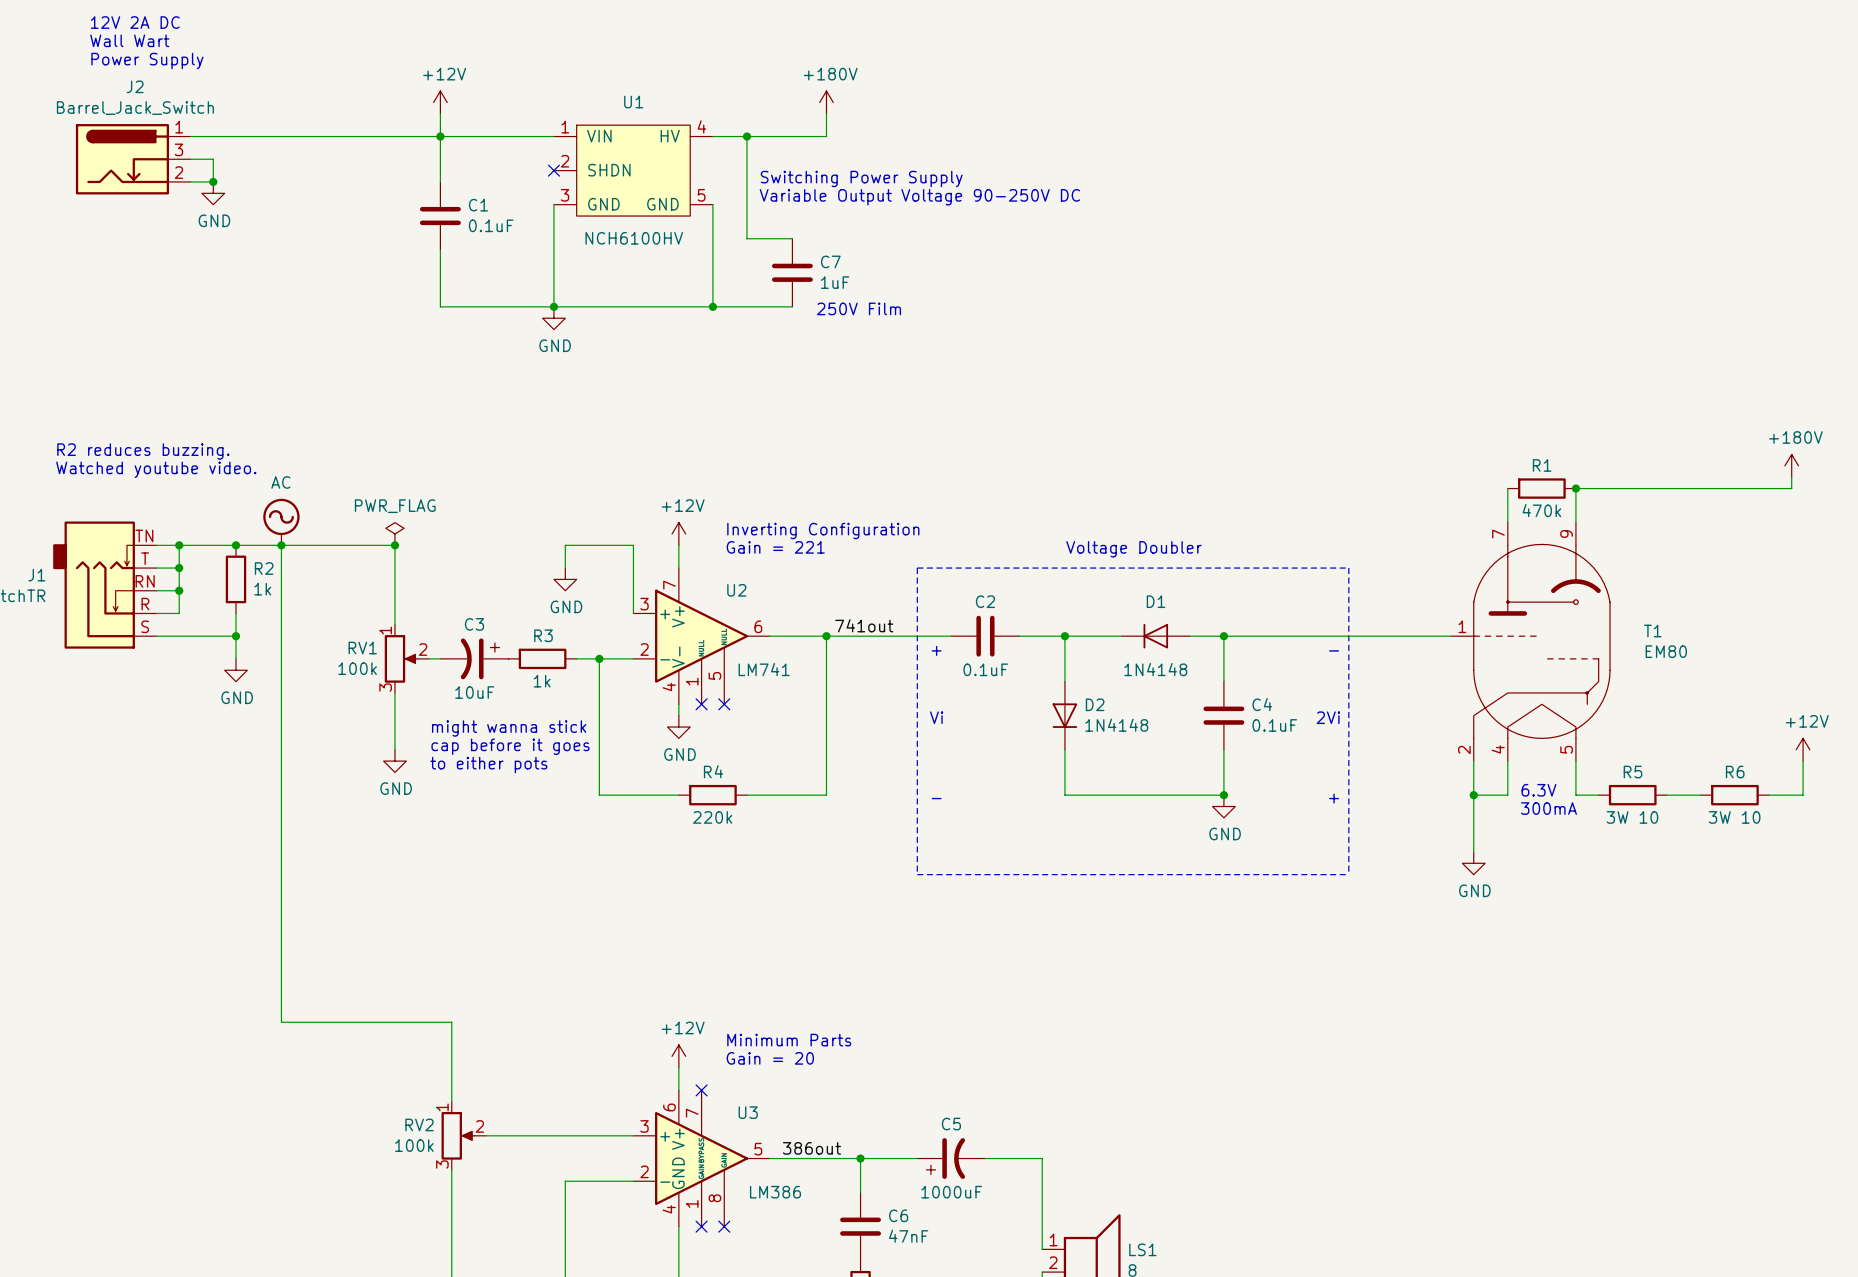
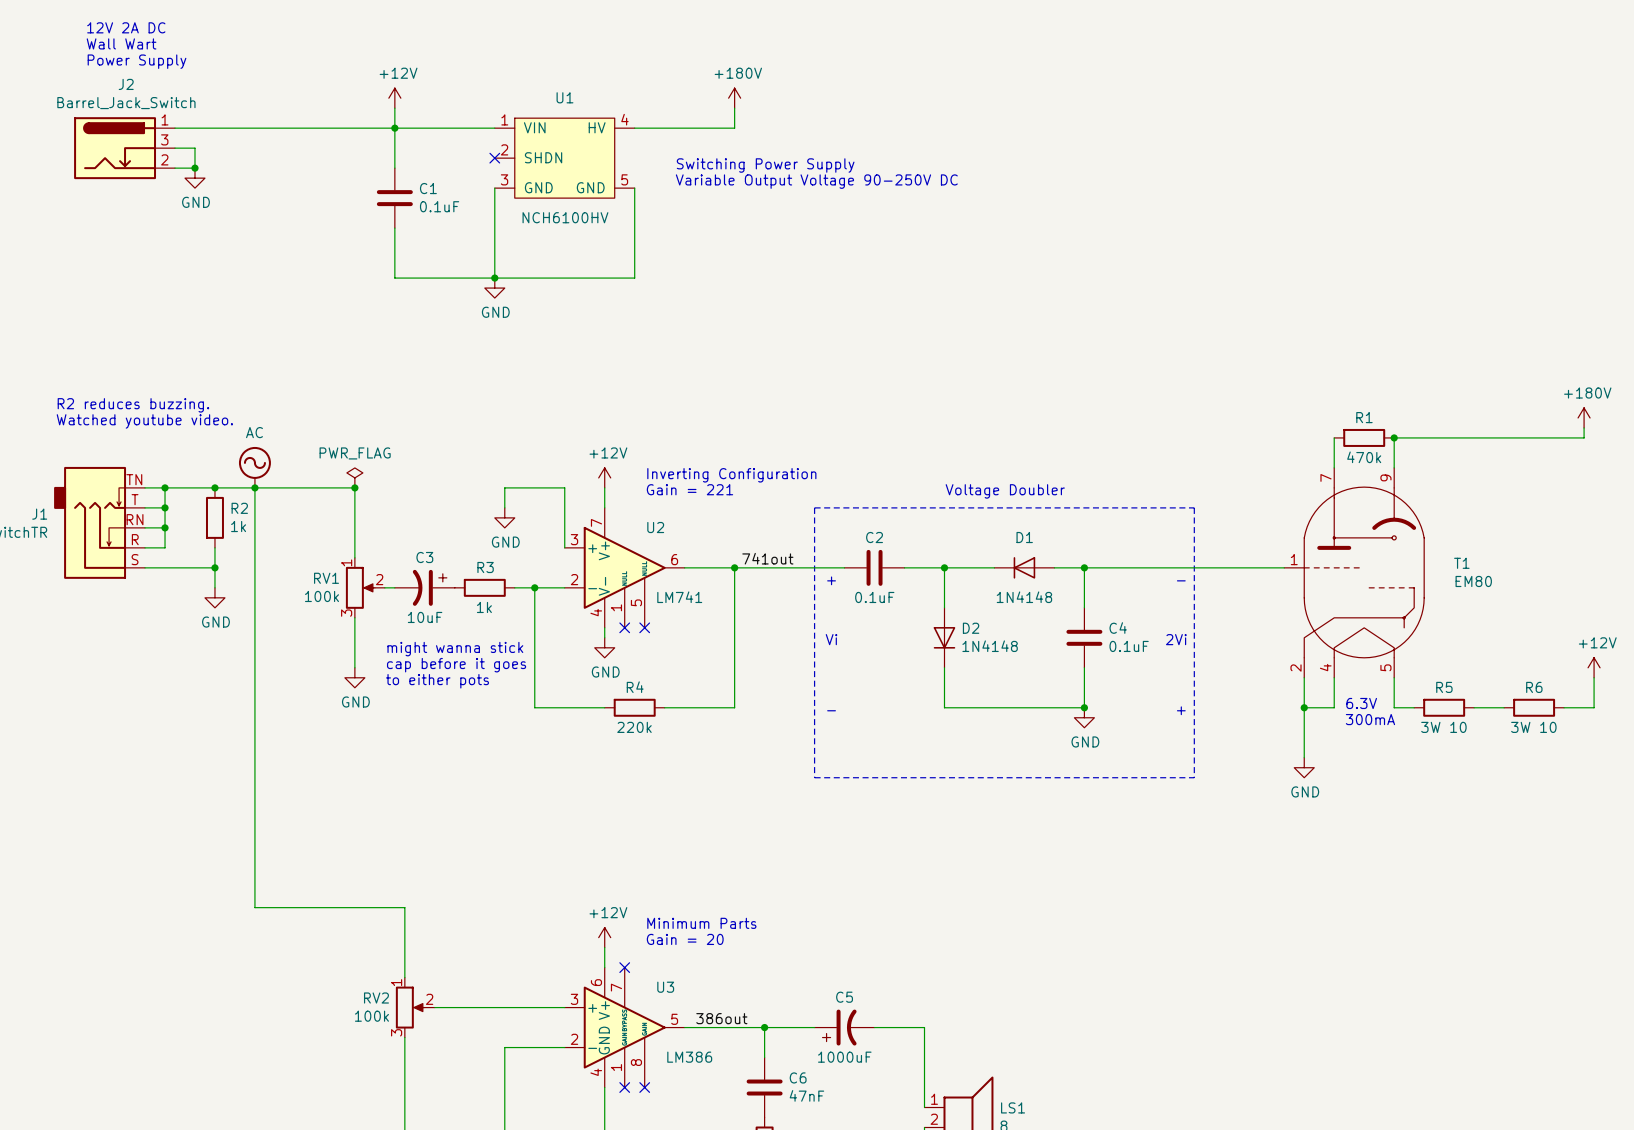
wire: (747, 136) (747, 238) (792, 238) -> none
junction: (747, 136) -> none
C7: 1uF (792, 272) -> none
wire: (712, 306) (792, 306) -> none
junction: (712, 306) -> none
text: 250V Film (859, 308) -> none

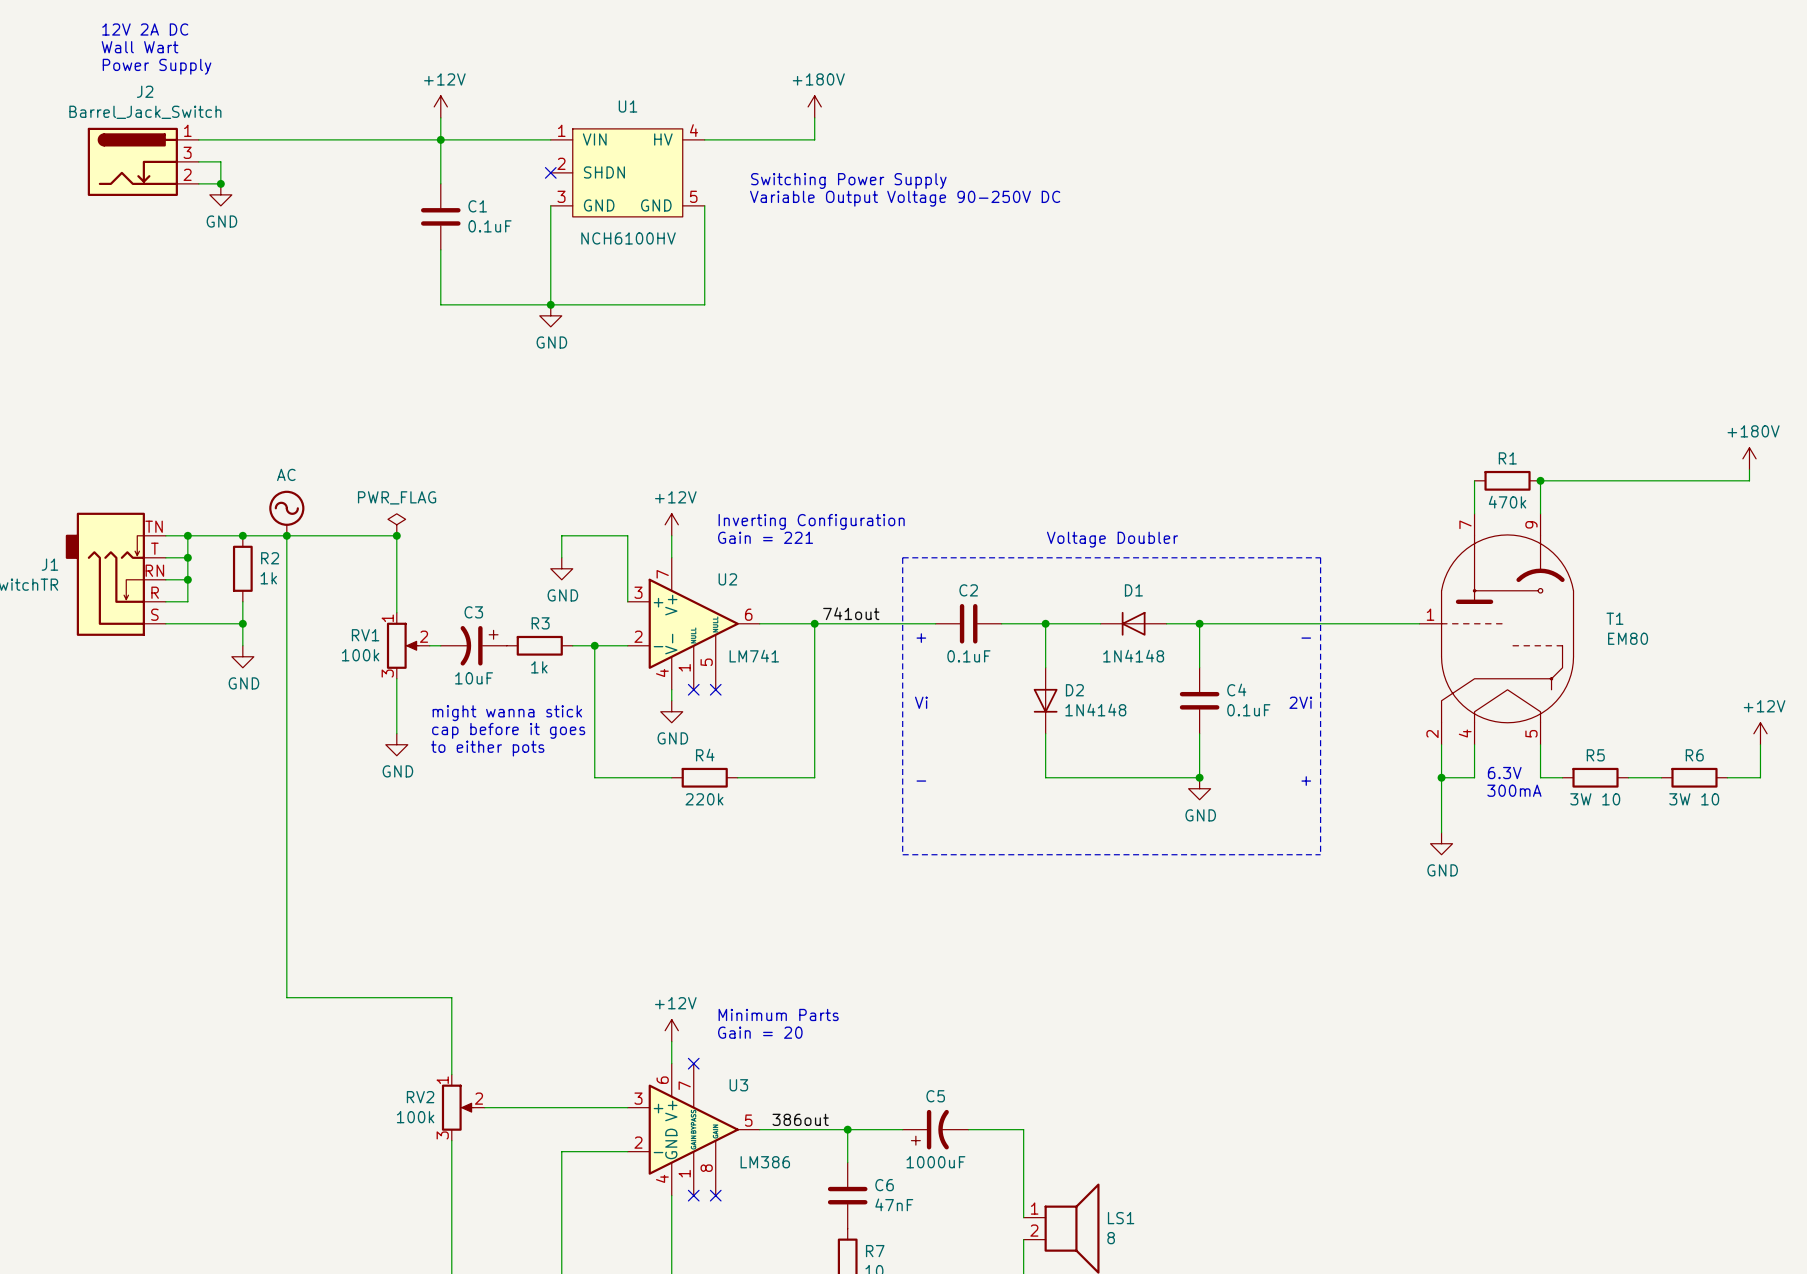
text: R2 reduces buzzing. (133, 405) -> none
text: Watched youtube video. (144, 421) -> none

